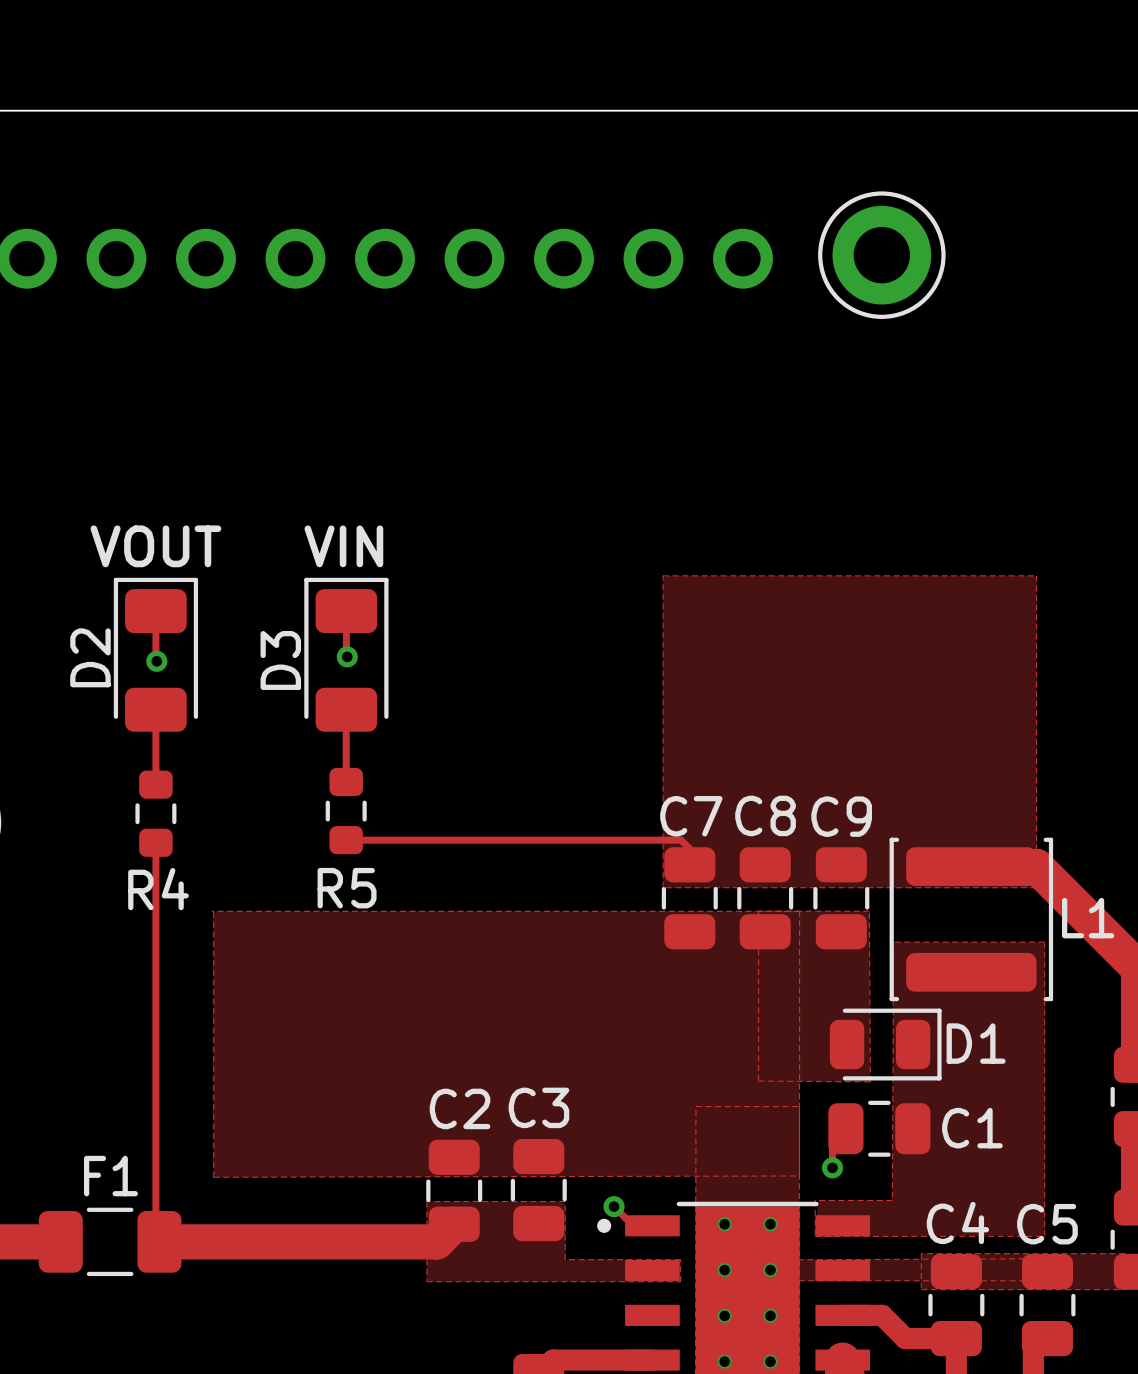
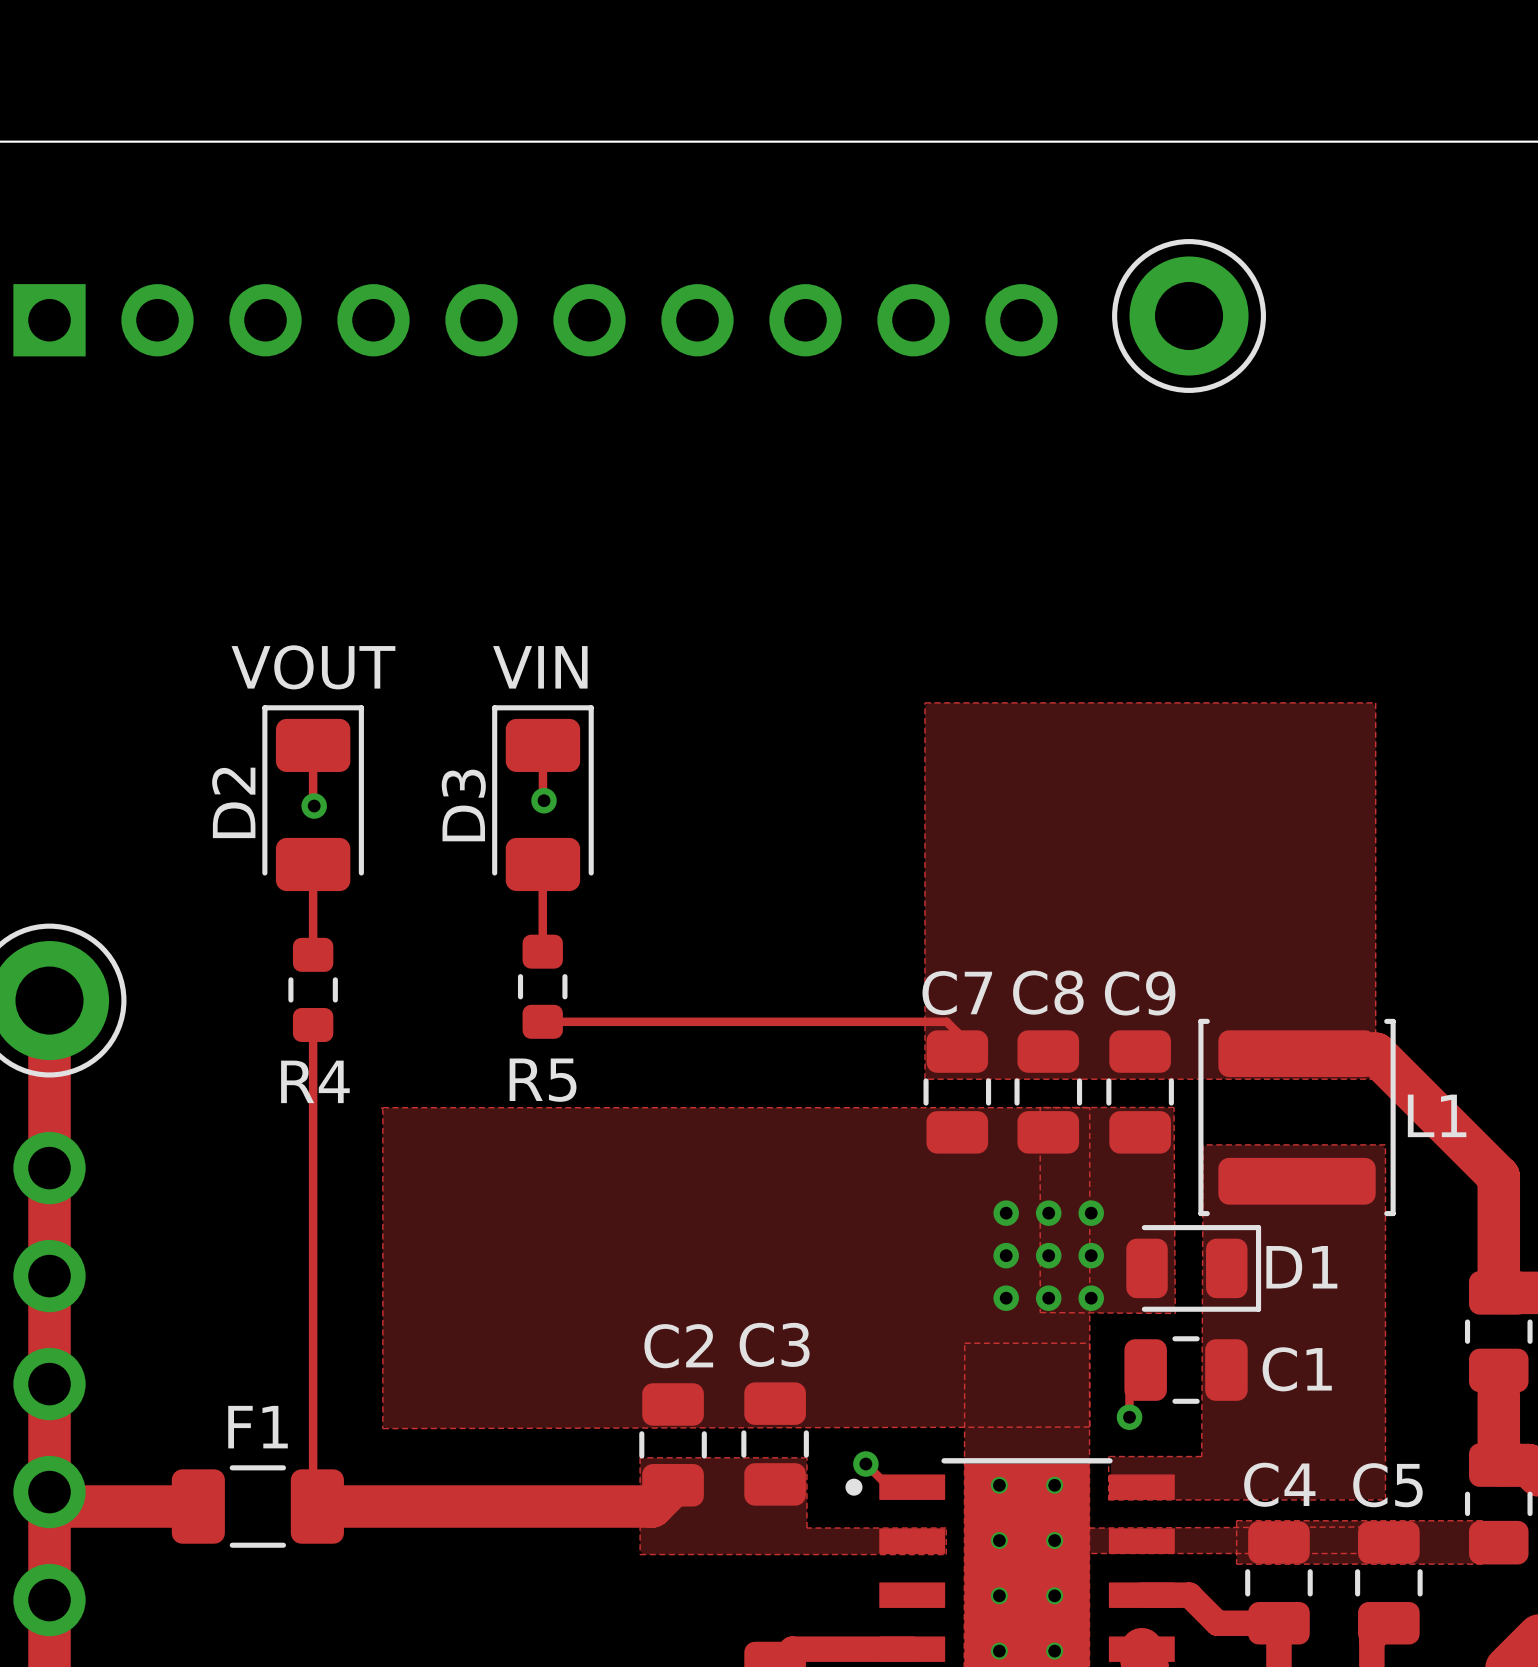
via: none -> (1006, 1213)
via: none -> (1048, 1213)
via: none -> (1091, 1213)
via: none -> (1006, 1255)
via: none -> (1048, 1255)
via: none -> (1091, 1255)
via: none -> (1006, 1298)
via: none -> (1048, 1298)
via: none -> (1091, 1298)

